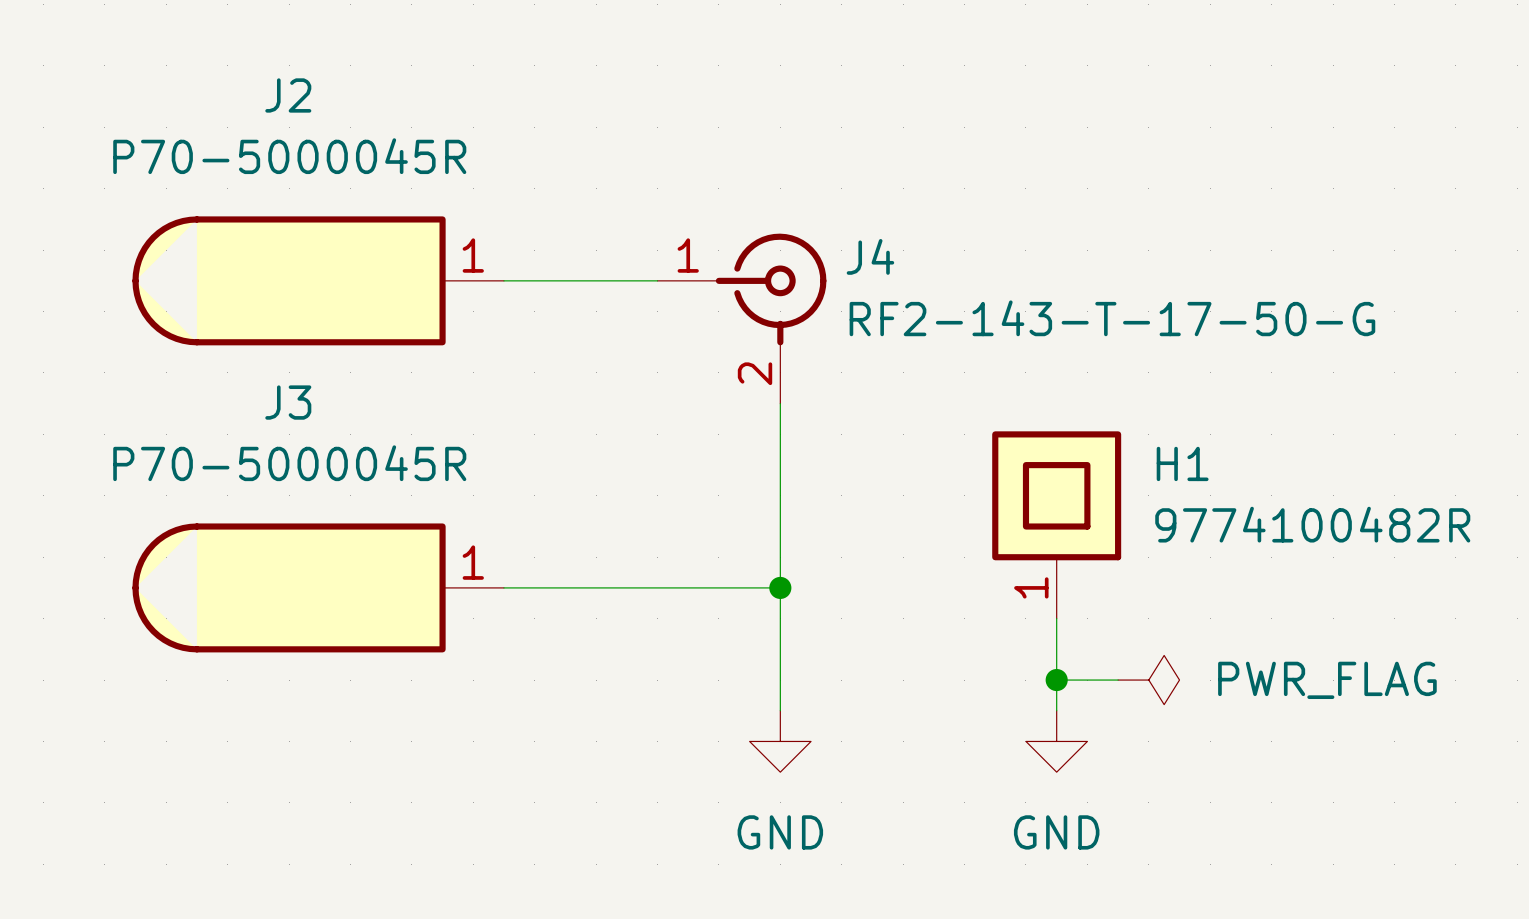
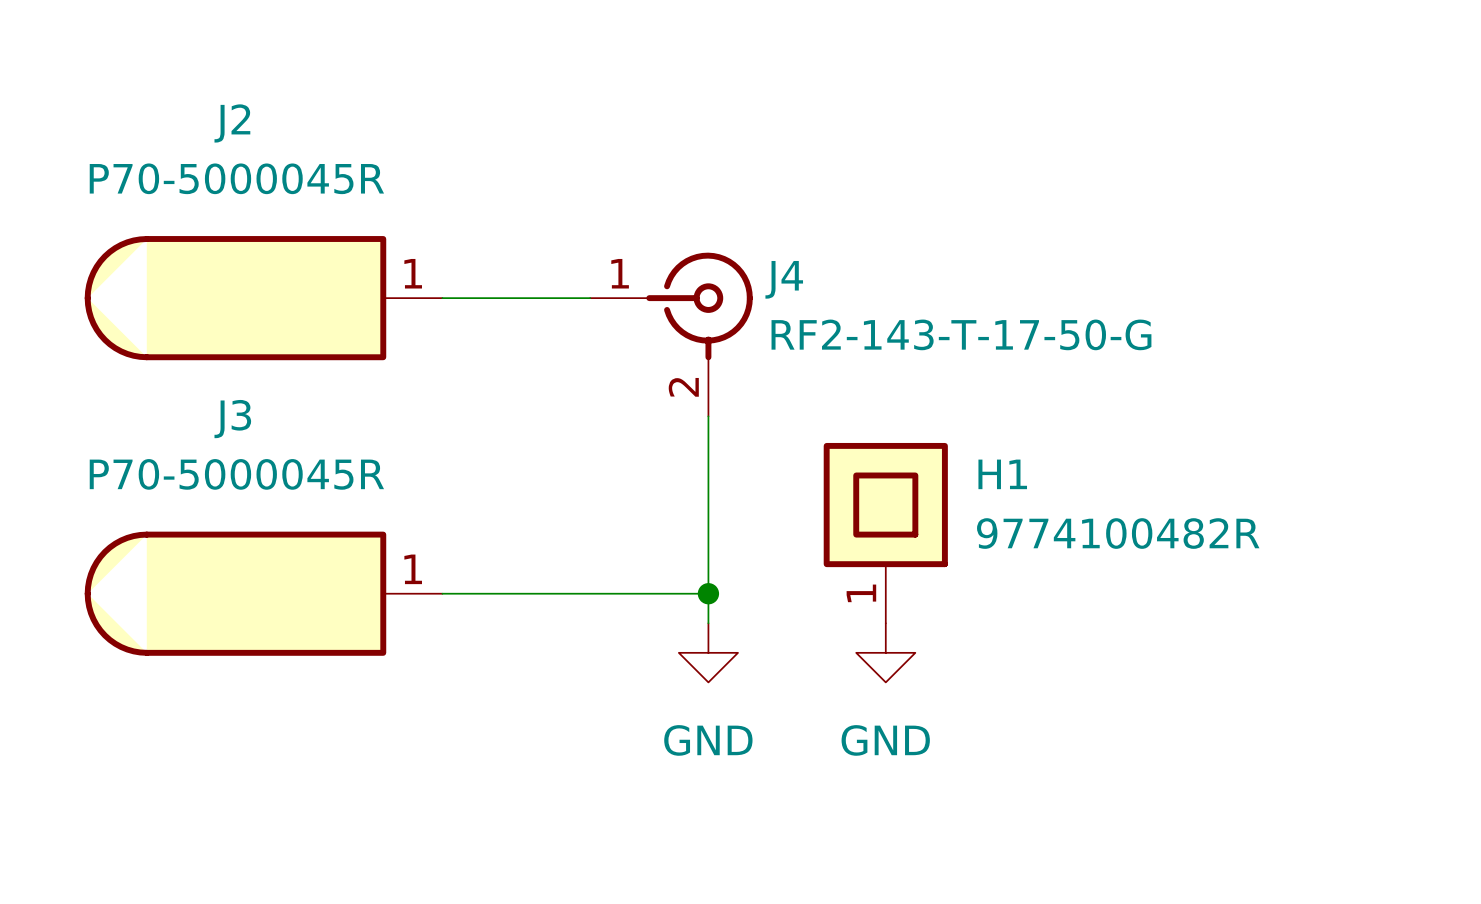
H1 position: (1056, 524) -> (885, 533)
wire: (780, 618) (780, 710) -> none
wire: (1056, 618) (1056, 710) -> none
power symbol: none -> GND (885, 652)
wire: (1056, 680) (1118, 680) -> none
junction: (1056, 680) -> none
power symbol: PWR_FLAG (1148, 680) -> none
power symbol position: GND (780, 741) -> GND (708, 652)
power symbol: GND (1056, 741) -> none

